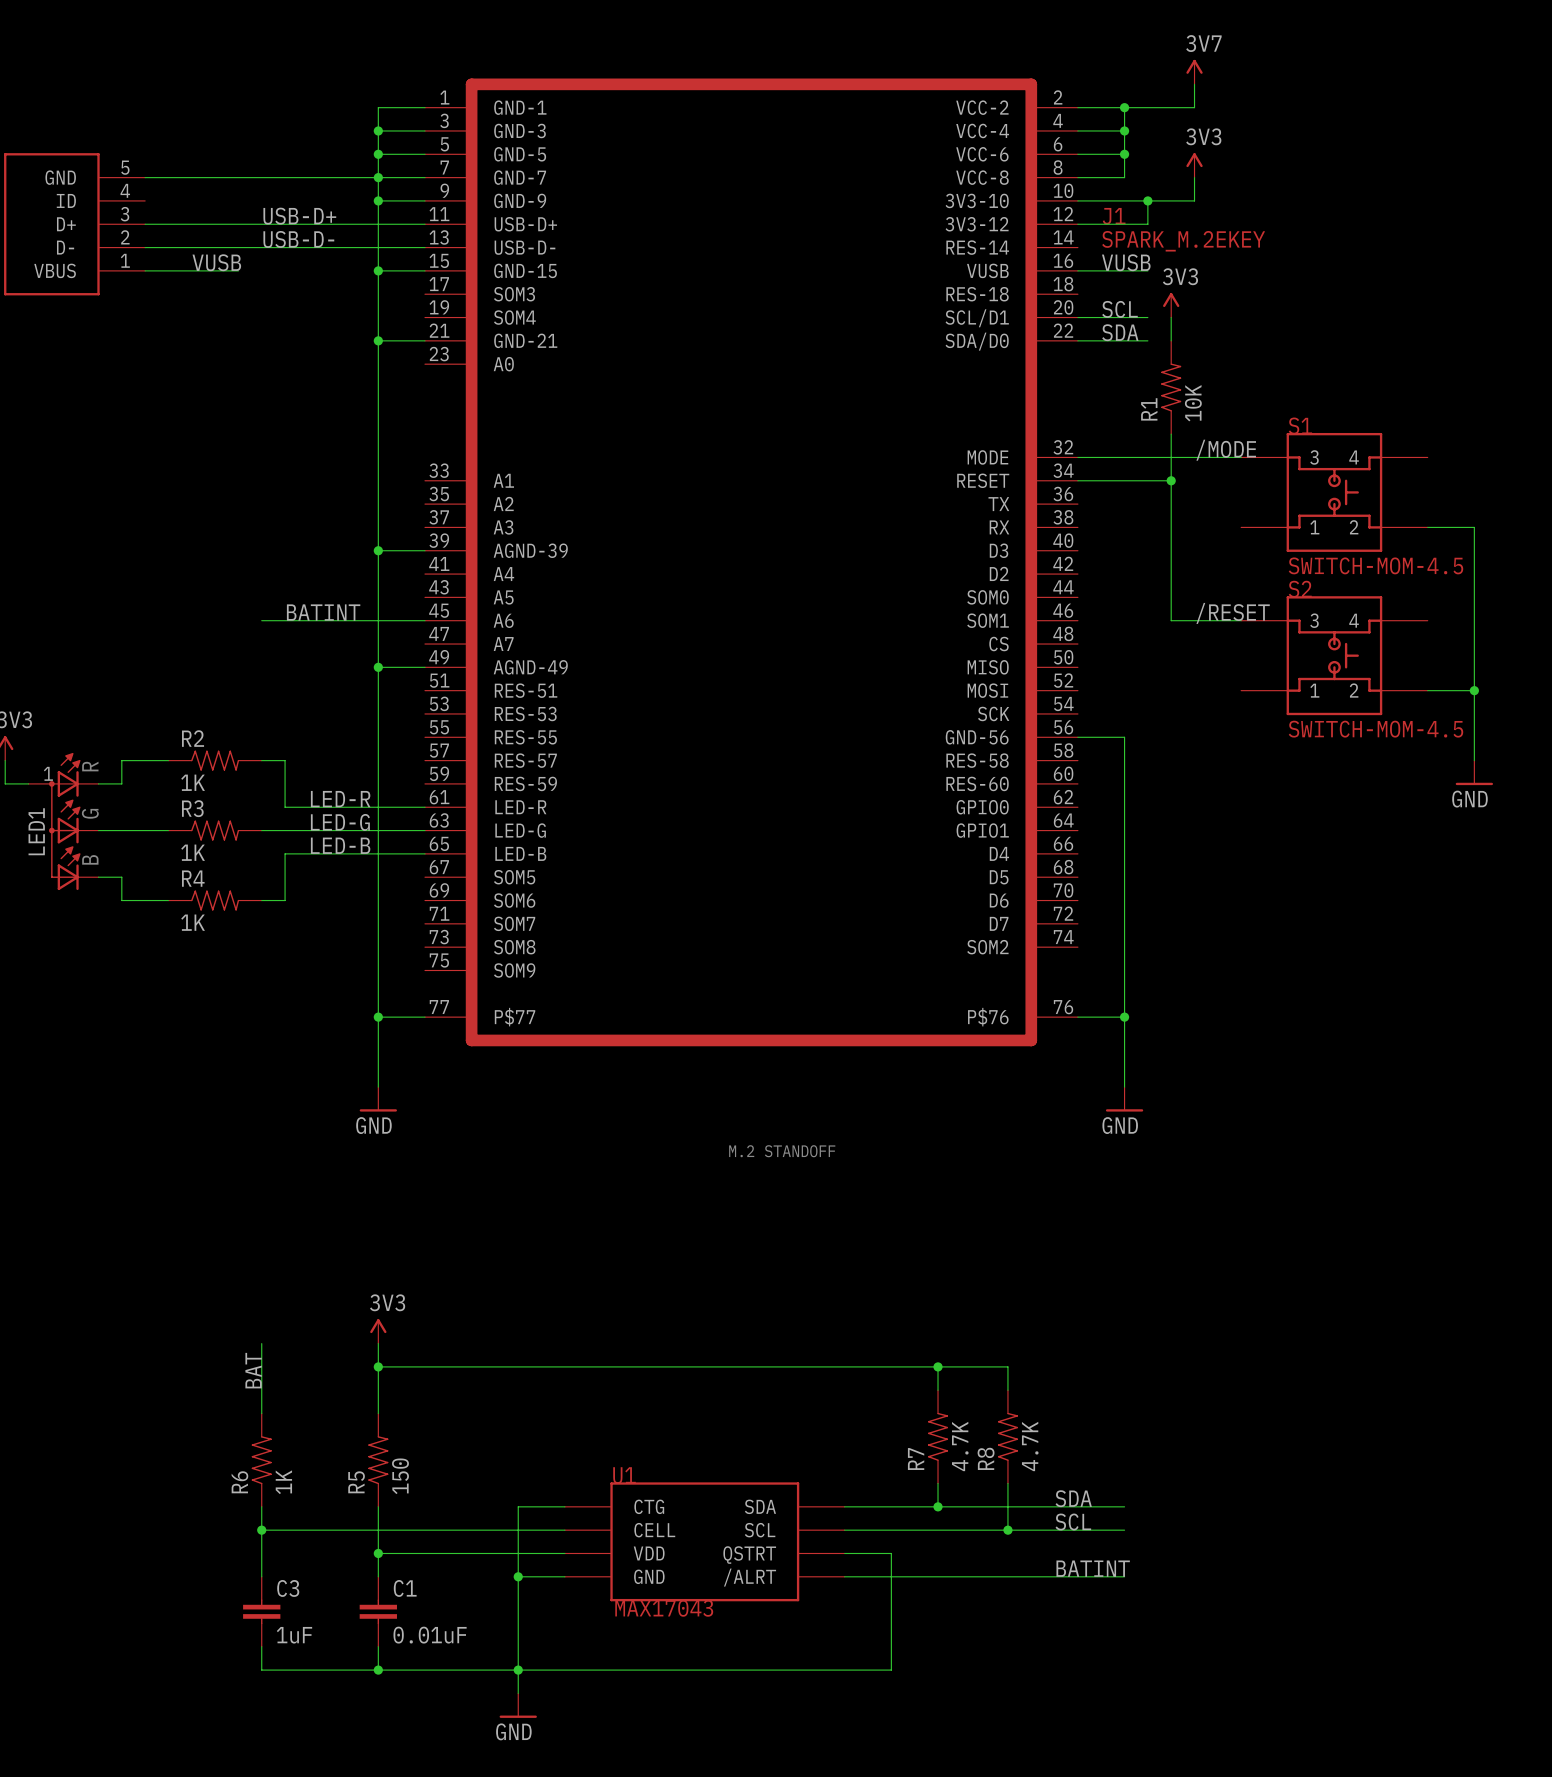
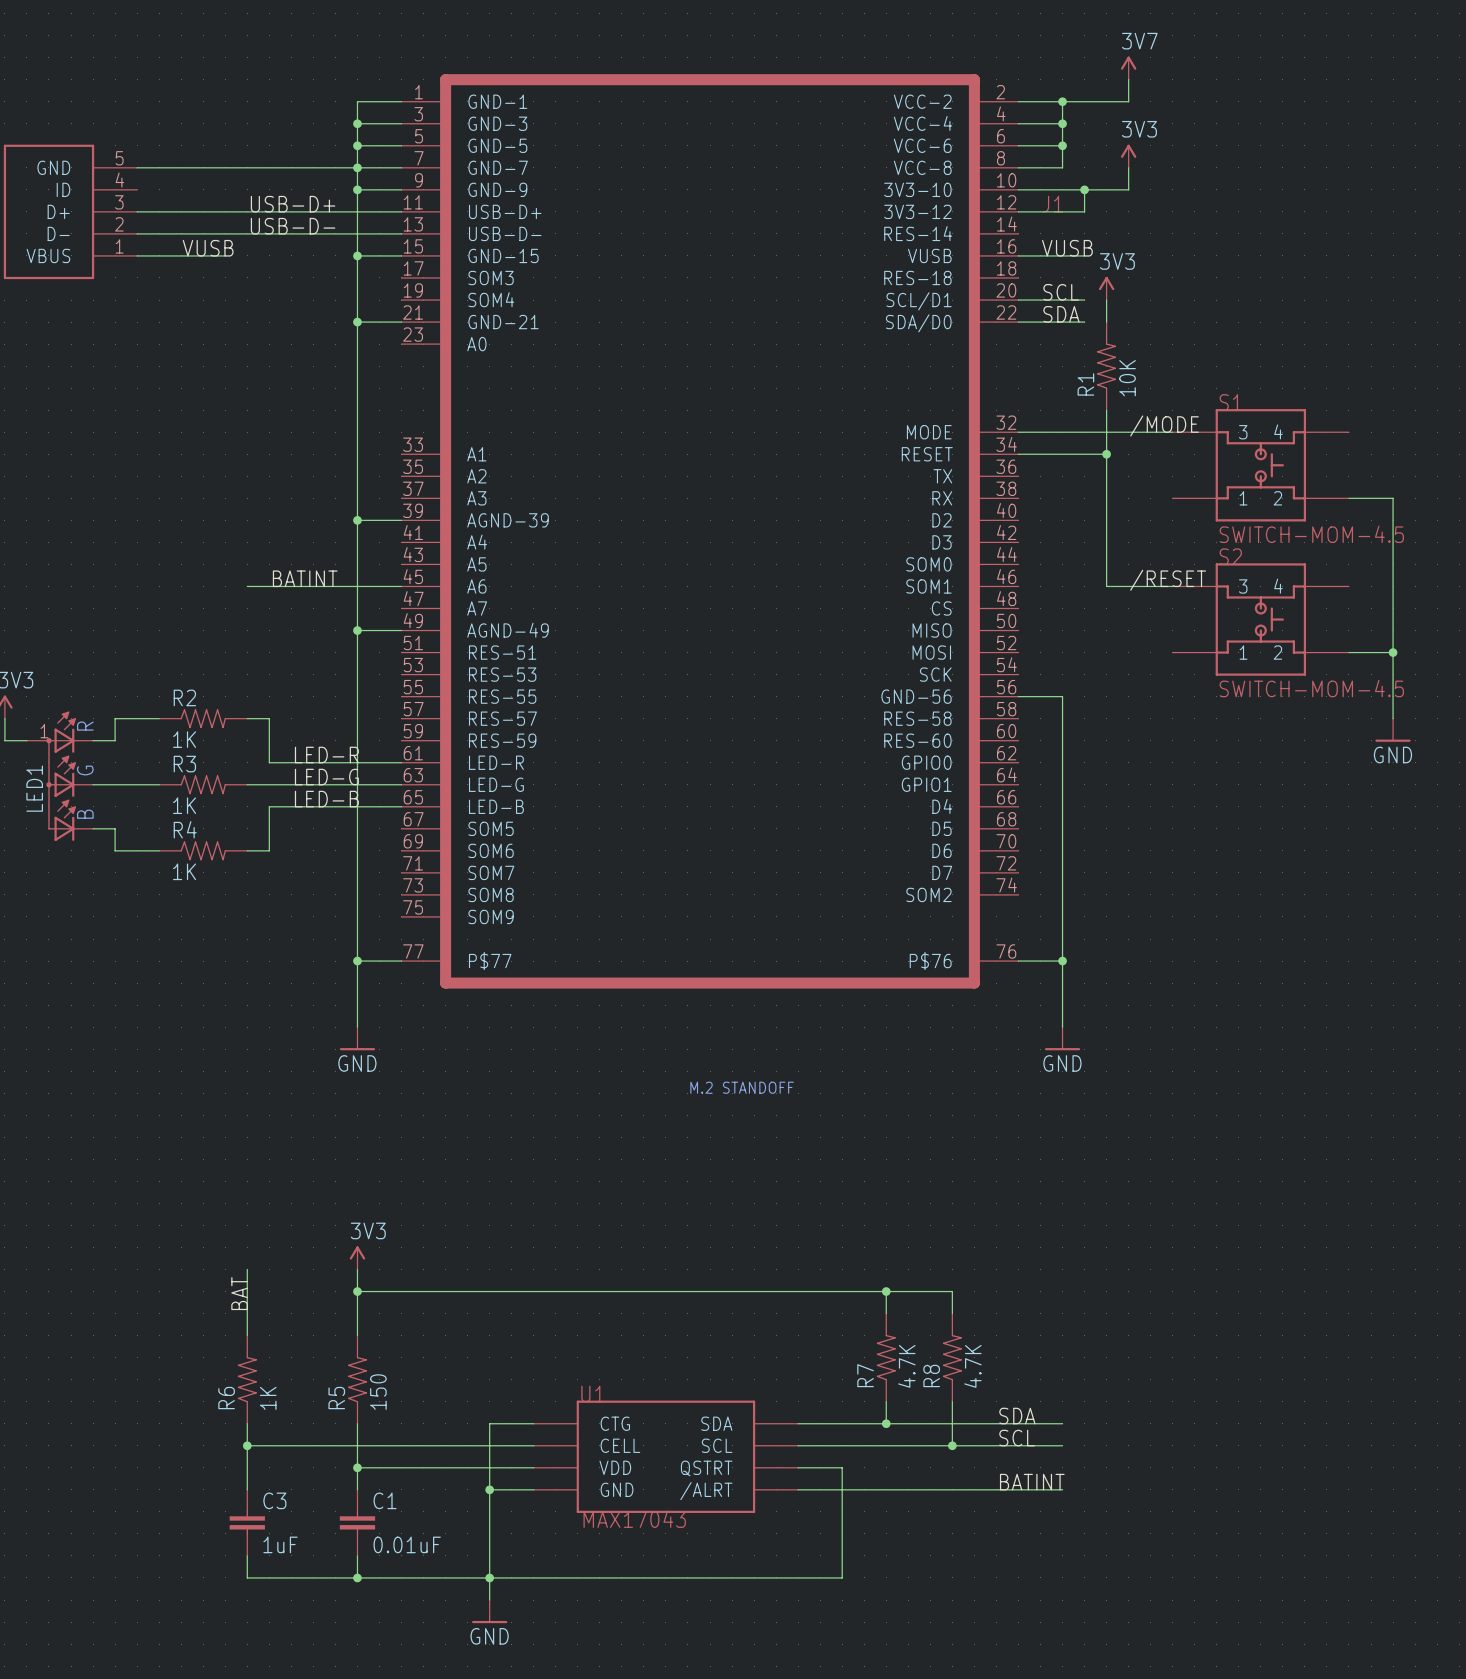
J1 value: SPARK_M.2EKEY (1183, 241) -> none
J1 pin name: D3 (999, 550) -> D2 (941, 520)
J1 pin name: D2 (999, 573) -> D3 (941, 542)

